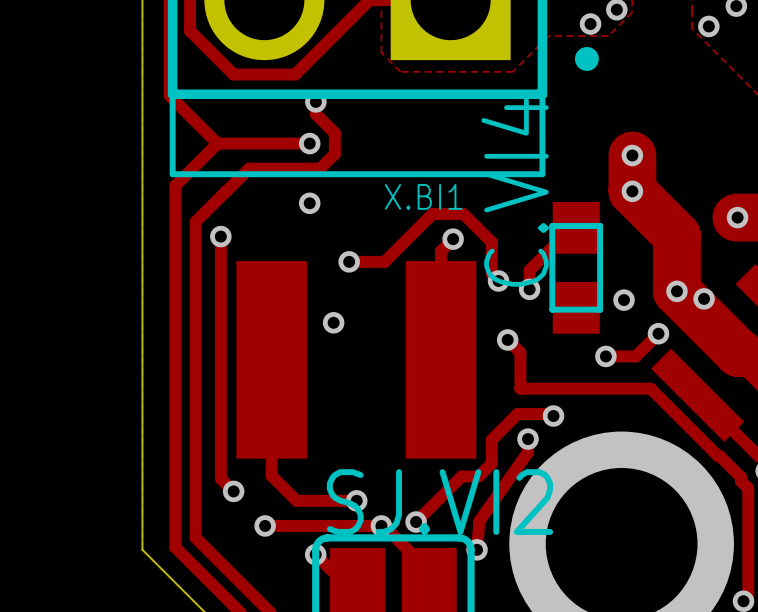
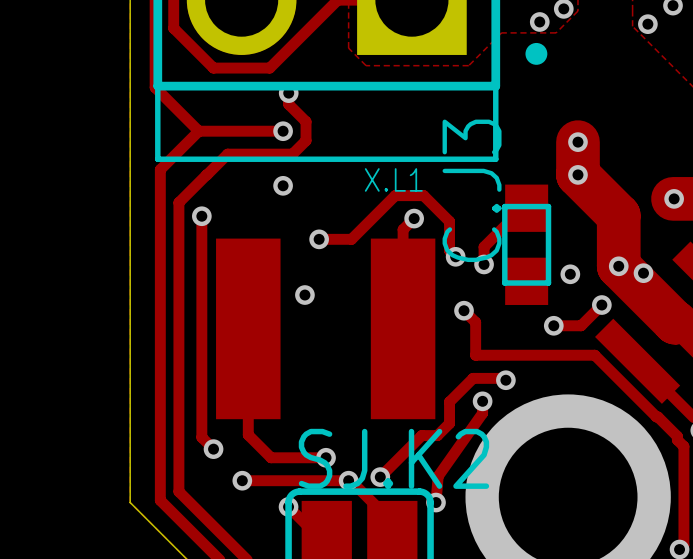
C.VI4 name: C.VI4 (515, 192) -> C.J3 (472, 190)
X.BI1 name: X.BI1 (423, 196) -> X.L1 (393, 179)
SJ.VI2 name: SJ.VI2 (439, 502) -> SJ.K2 (393, 458)

